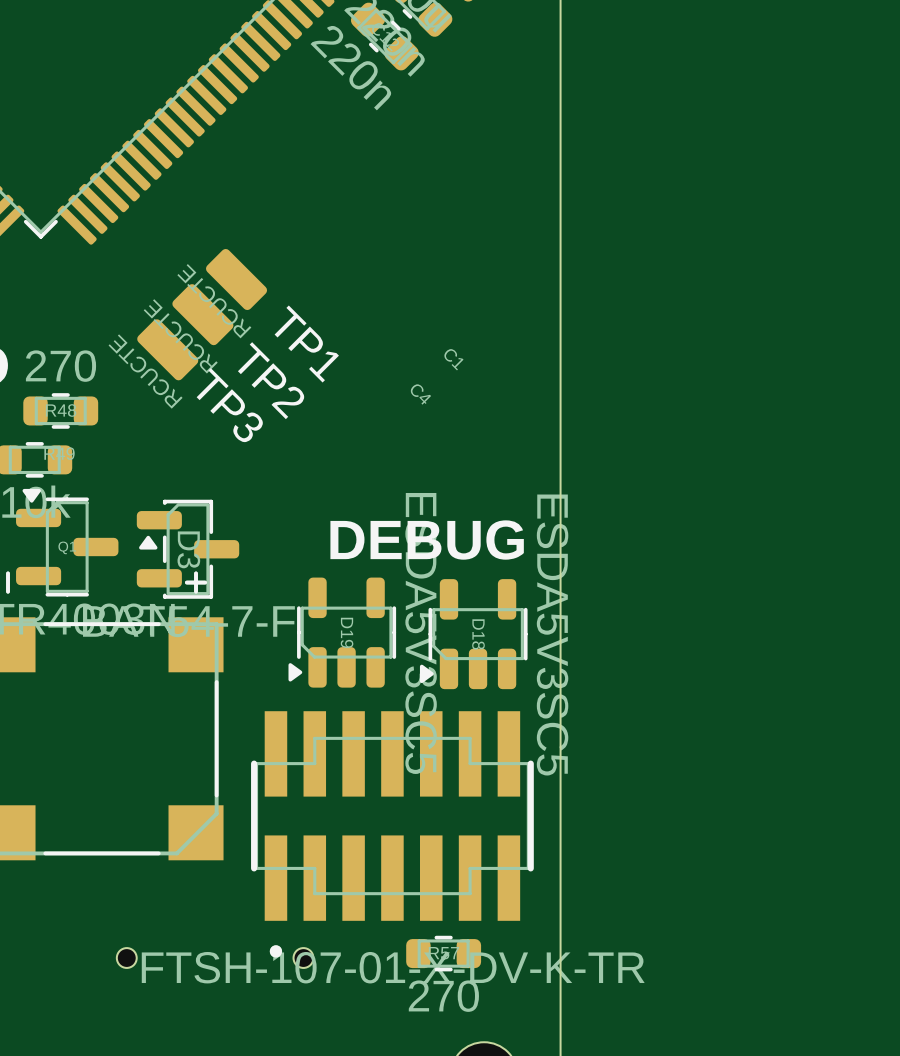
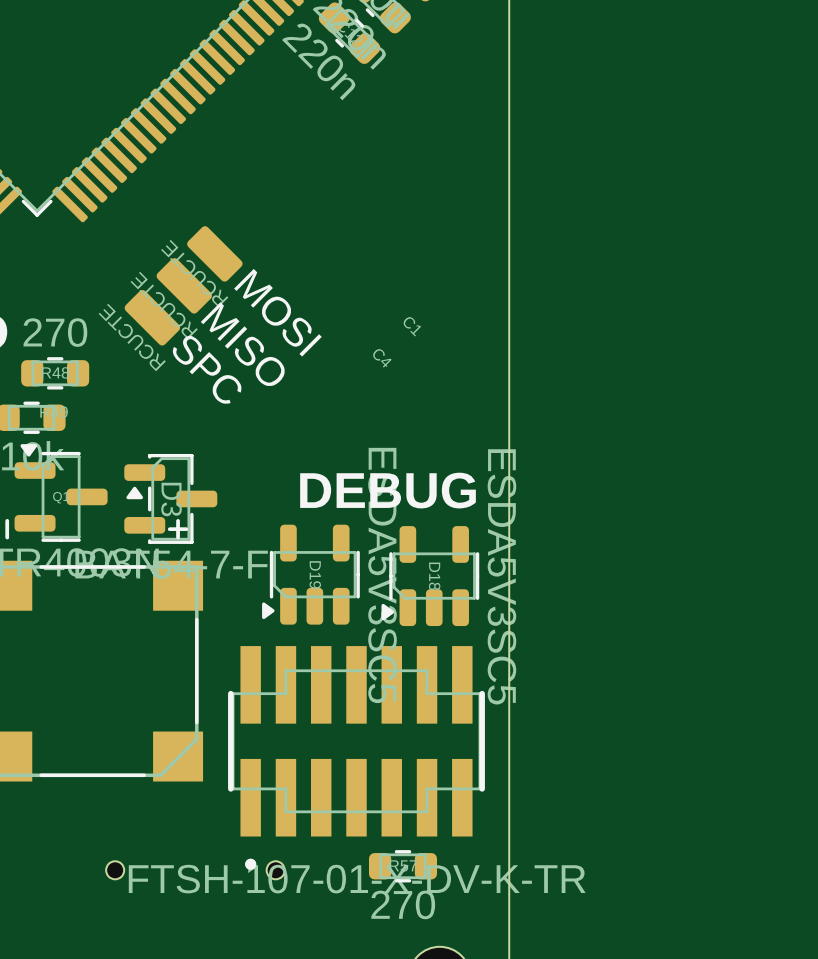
TP1 name: TP1 (306, 344) -> MOSI (277, 312)
TP2 name: TP2 (271, 380) -> MISO (243, 344)
TP3 name: TP3 (229, 405) -> SPC (206, 369)

